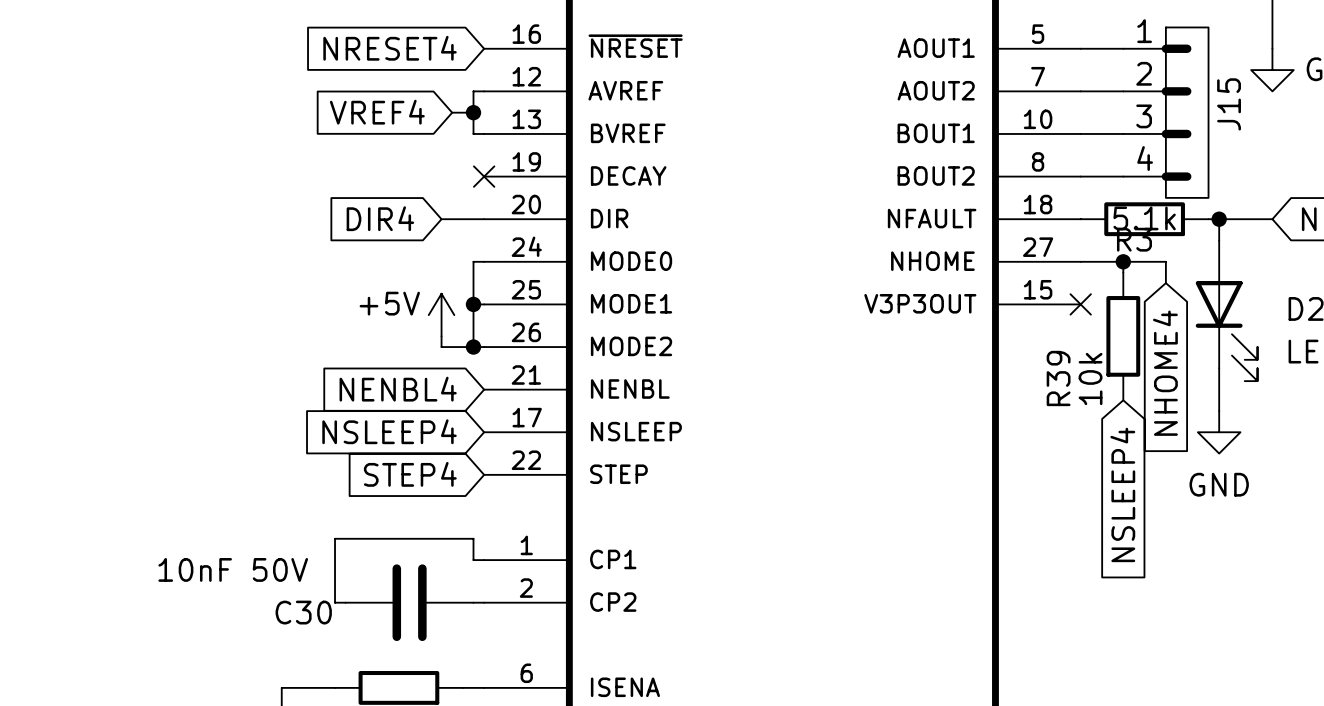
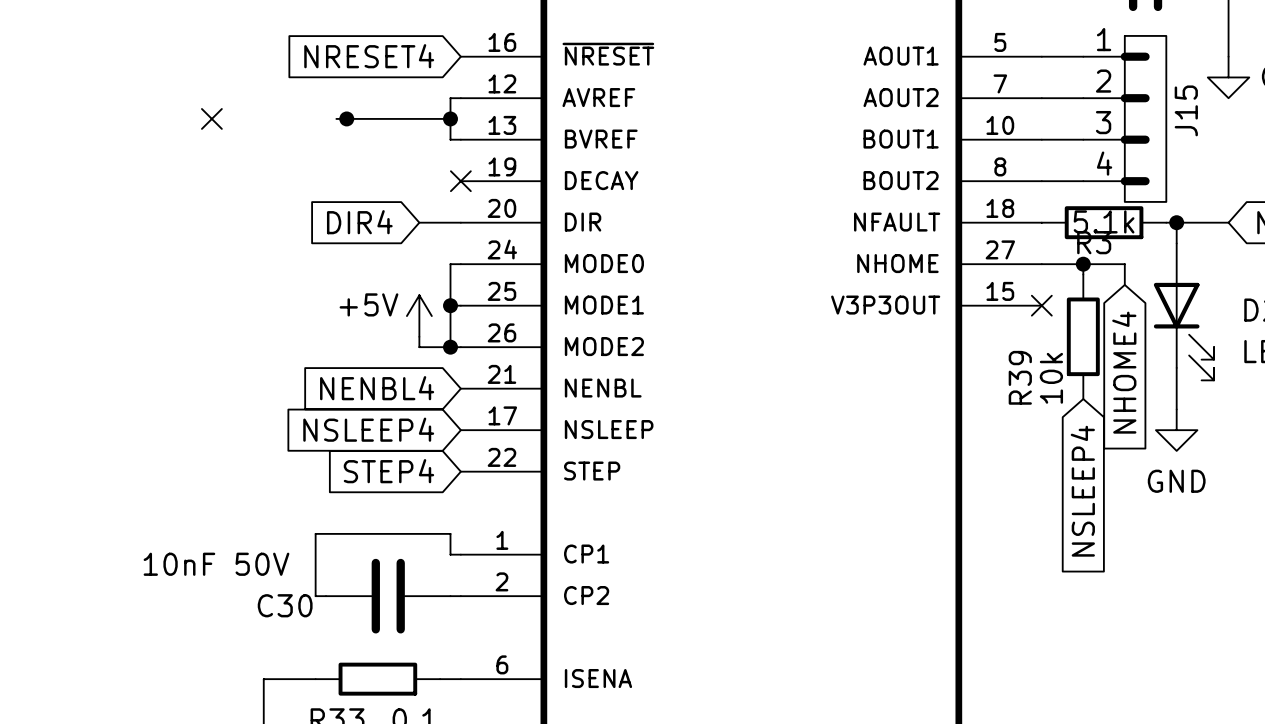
no-connect mark: none -> (211, 118)
wire: none -> (336, 118) (429, 118)
junction: none -> (346, 118)
global label: VREF4 (377, 112) -> none

